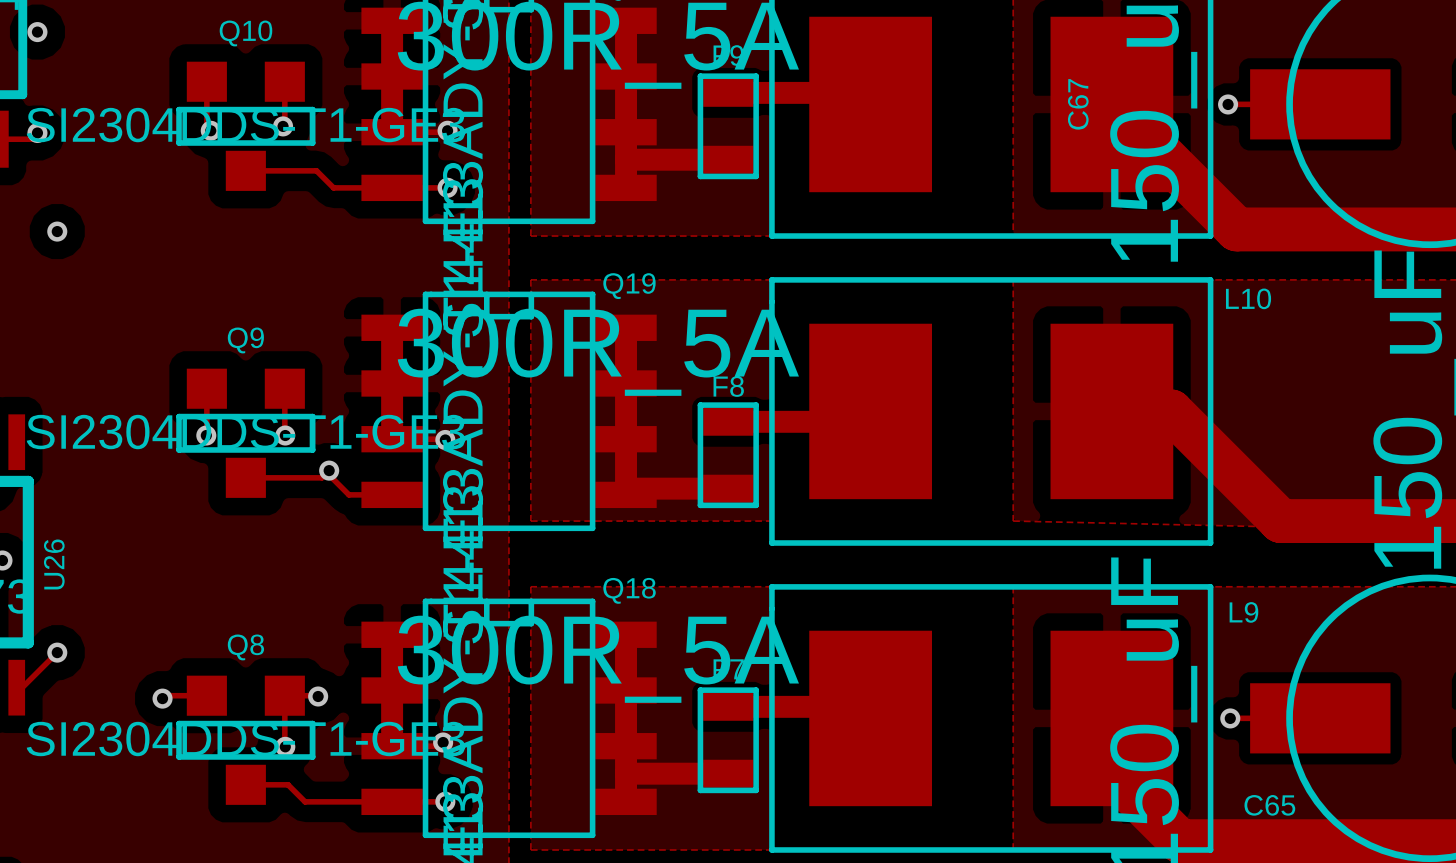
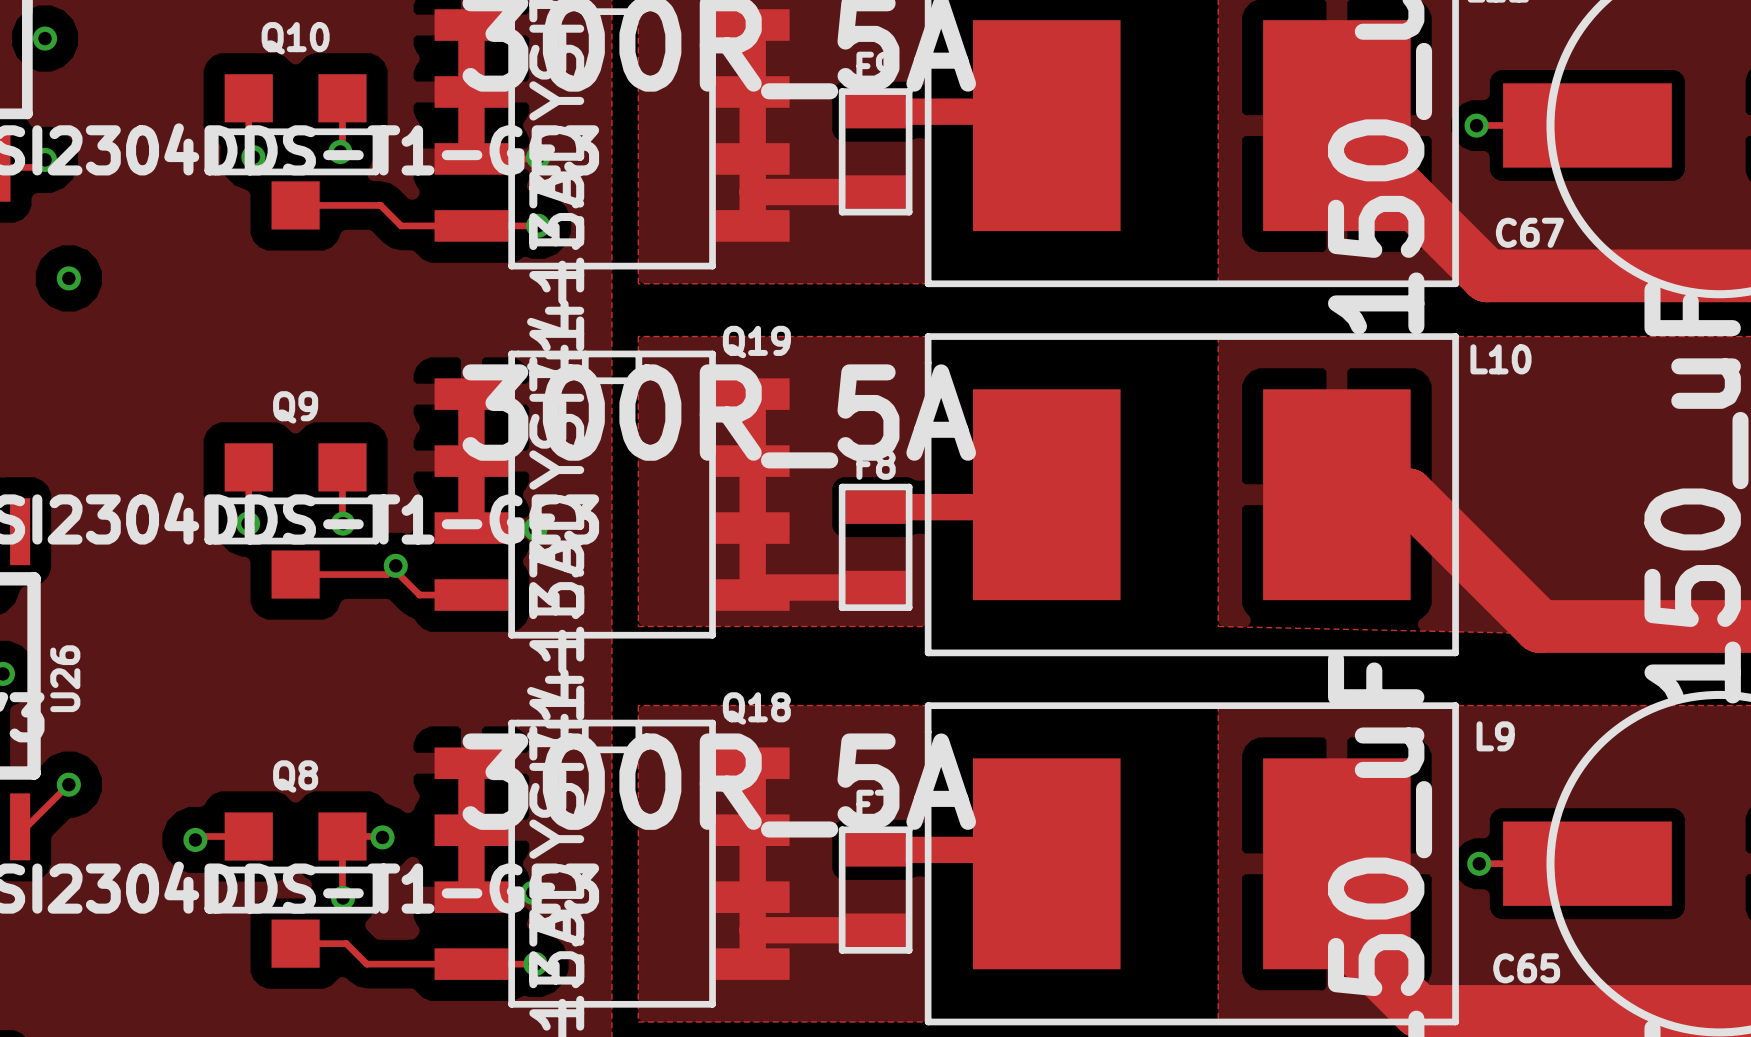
C67 name rotation: 0° (1078, 104) -> 90° clockwise (1529, 232)
C67 name position: C67 (1078, 104) -> C67 (1529, 232)

